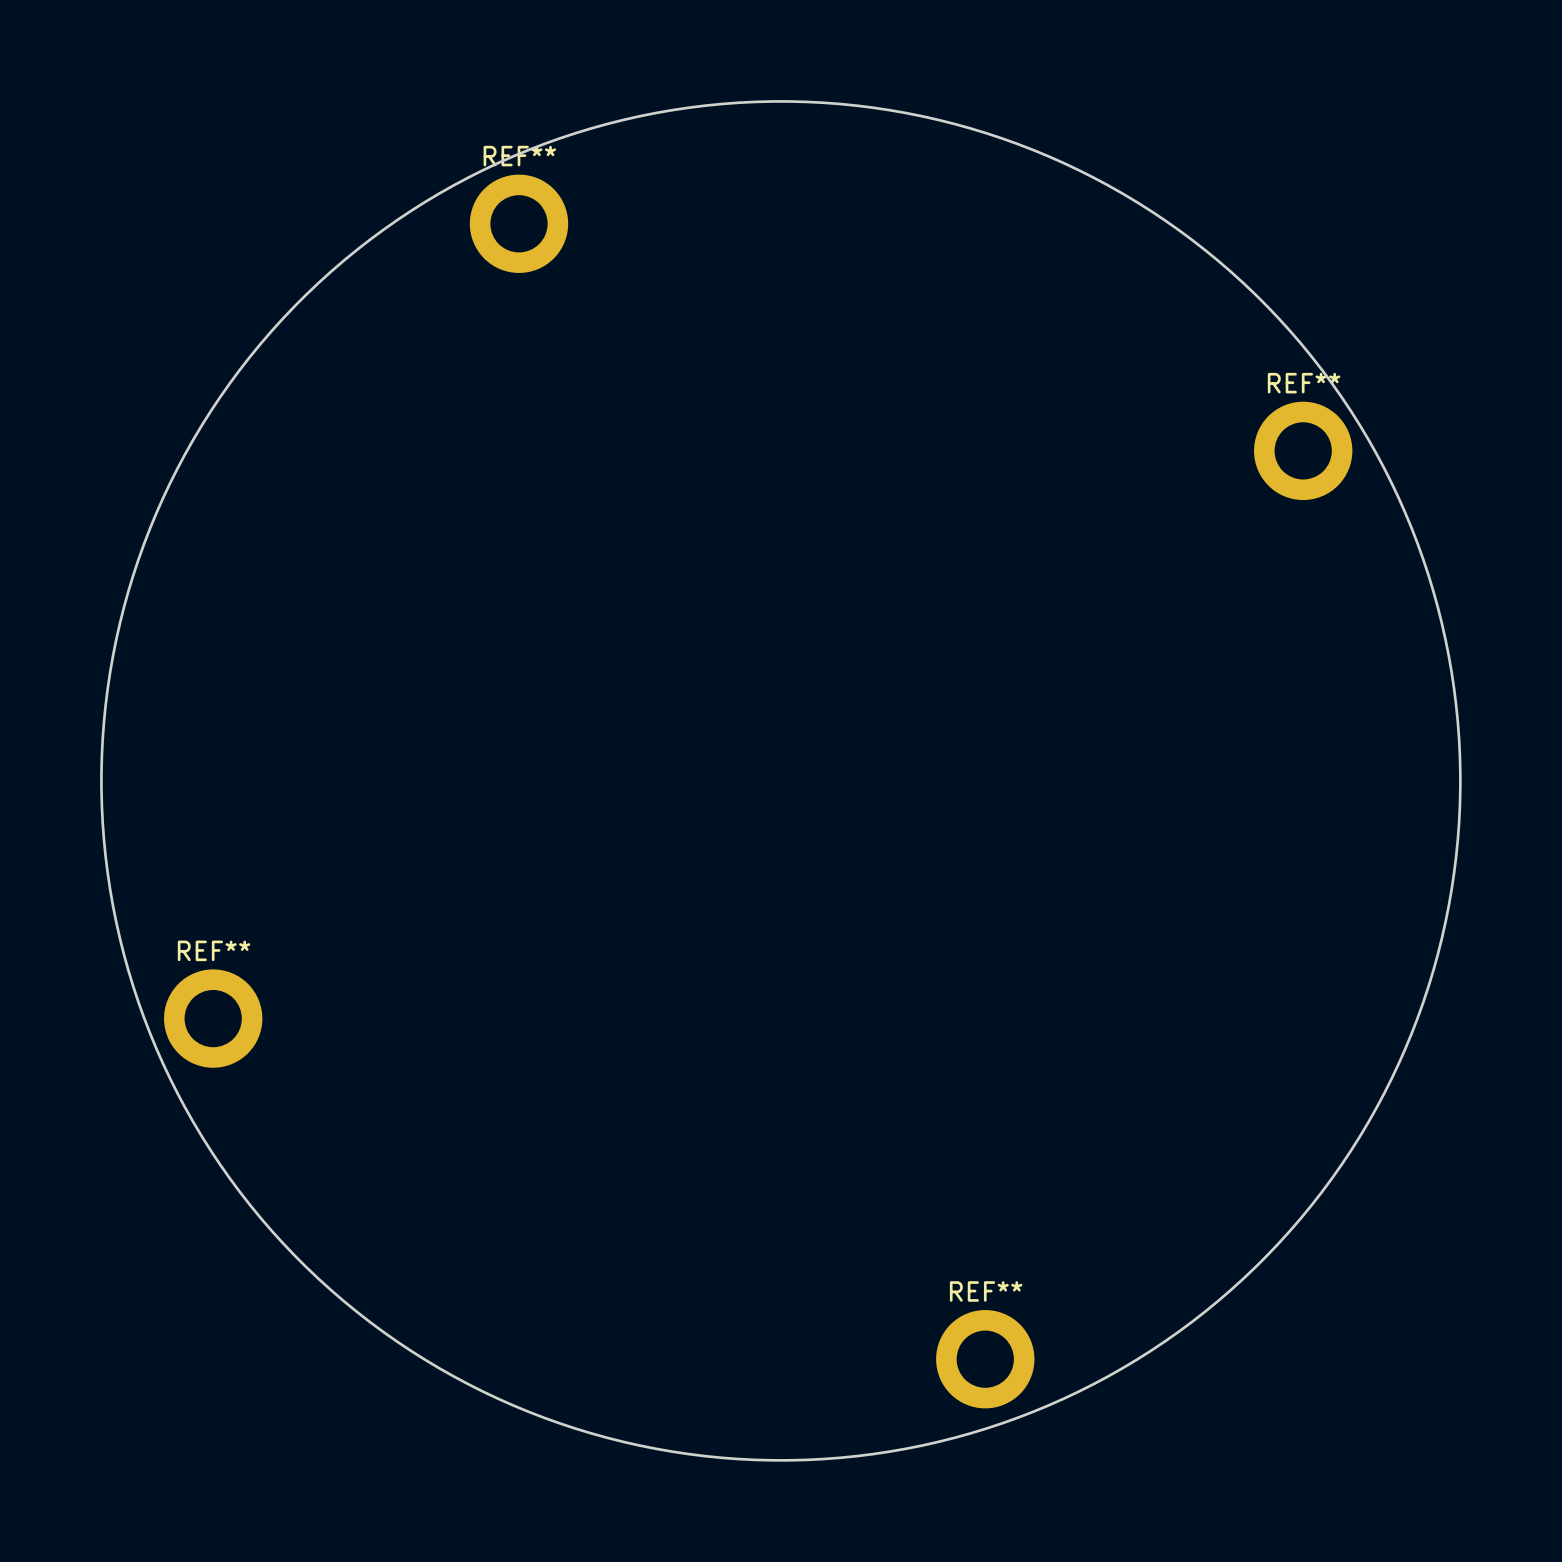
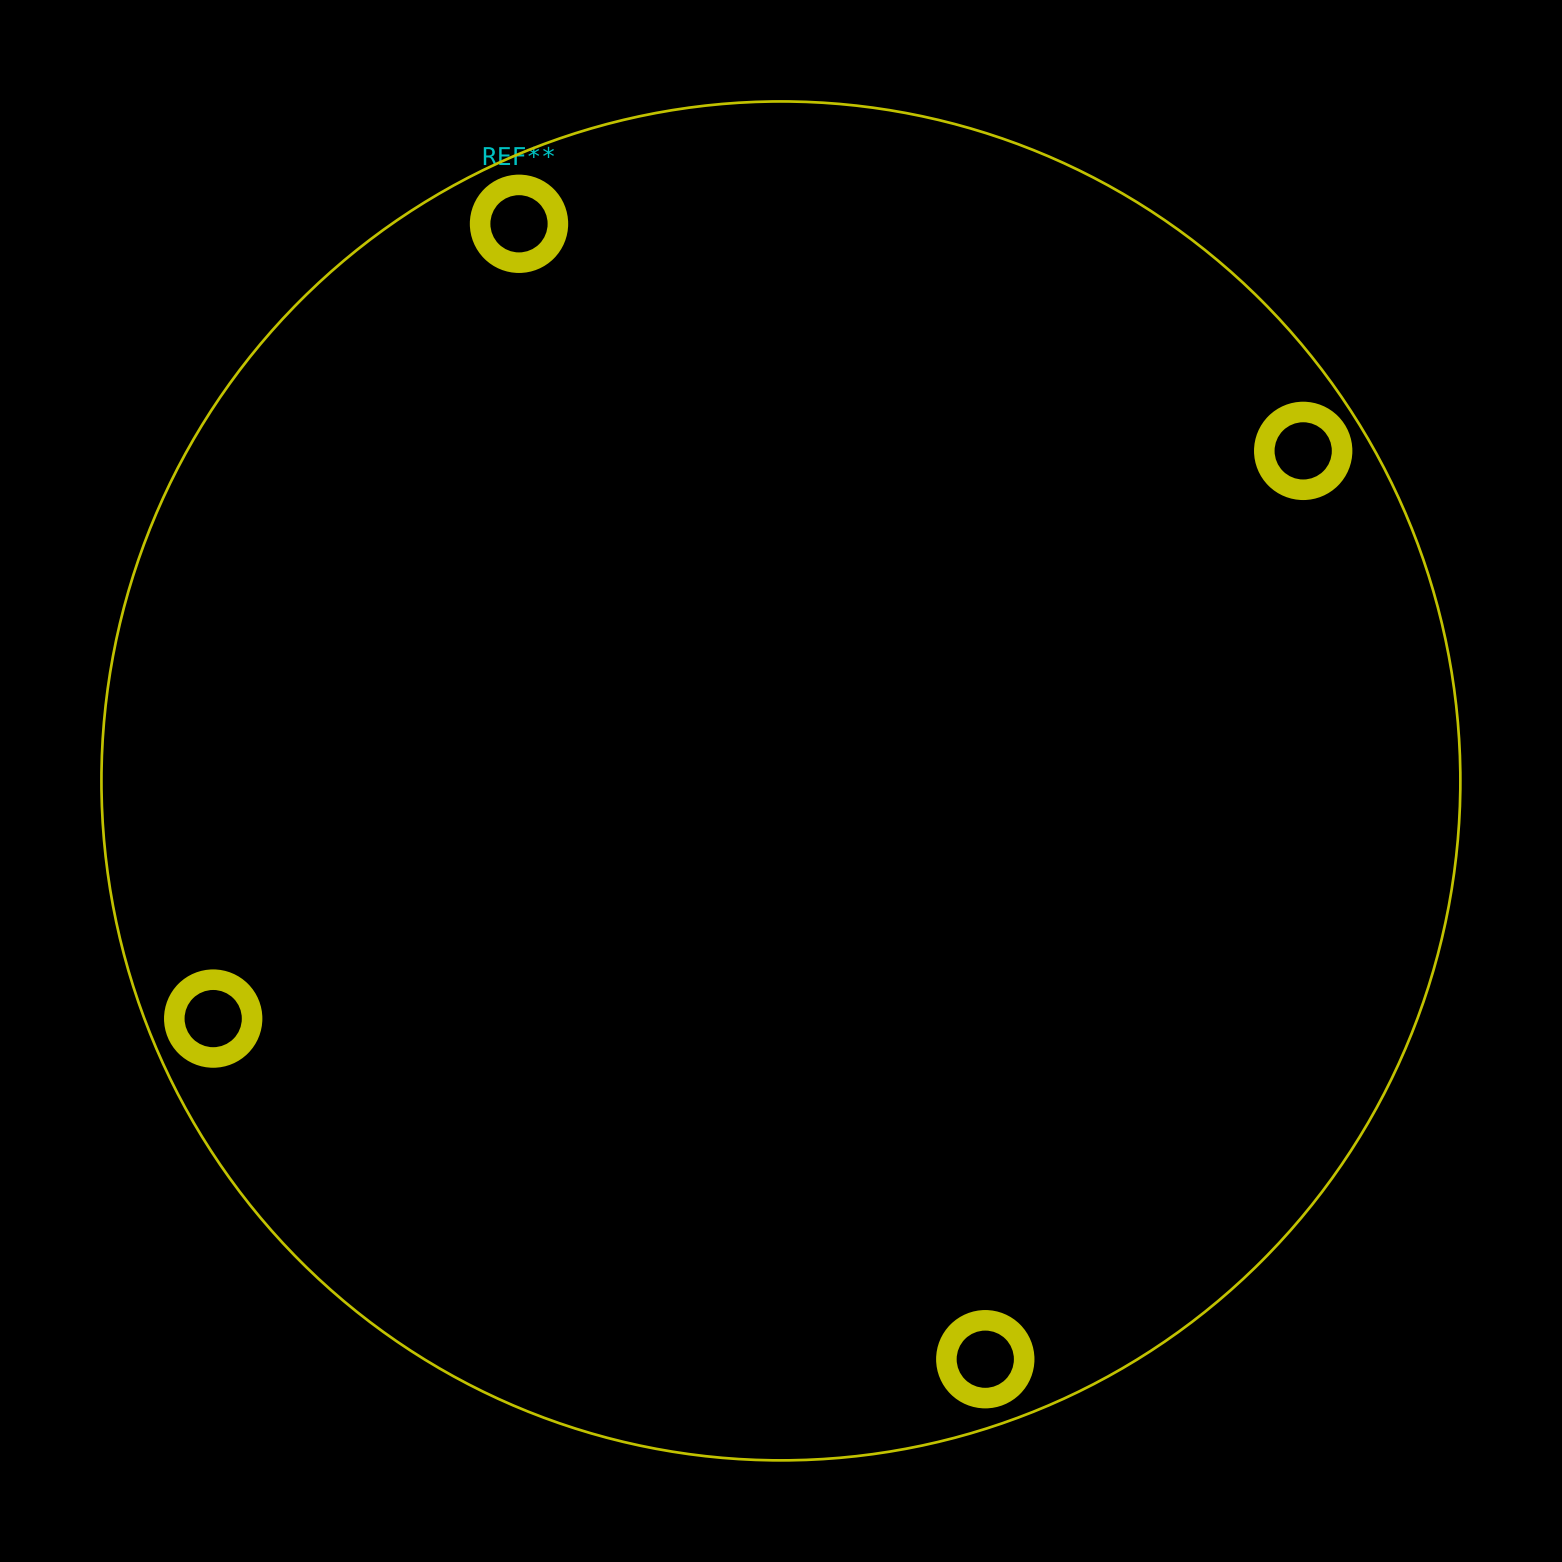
REF** name: REF** (1304, 383) -> none
REF** name: REF** (214, 950) -> none
REF** name: REF** (986, 1291) -> none

